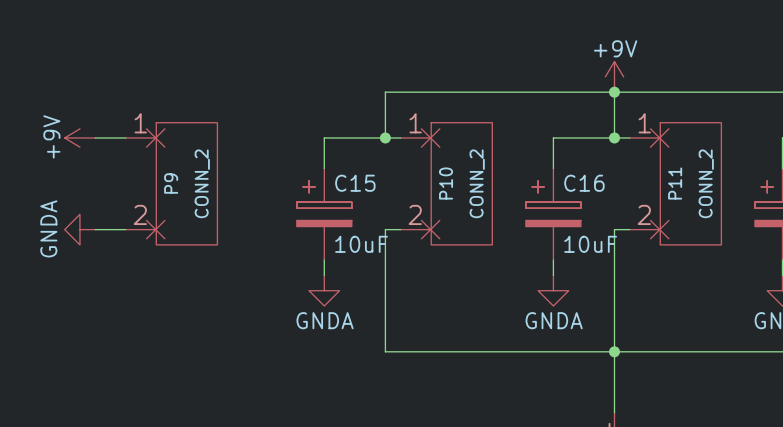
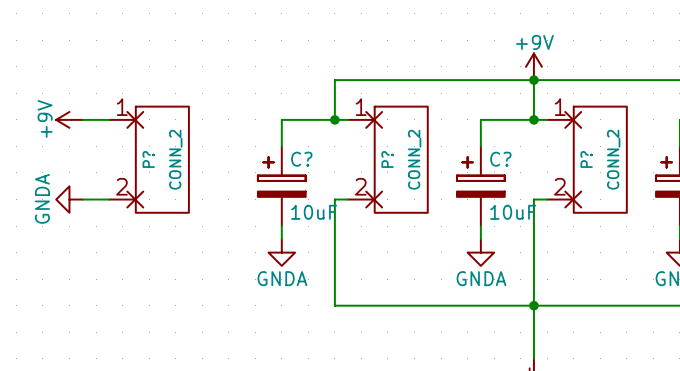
P9 name: P9 (171, 183) -> P? (148, 159)
C15 name: C15 (355, 183) -> C? (301, 159)
P10 name: P10 (446, 183) -> P? (387, 159)
C16 name: C16 (584, 183) -> C? (500, 159)
P11 name: P11 (675, 183) -> P? (586, 159)

